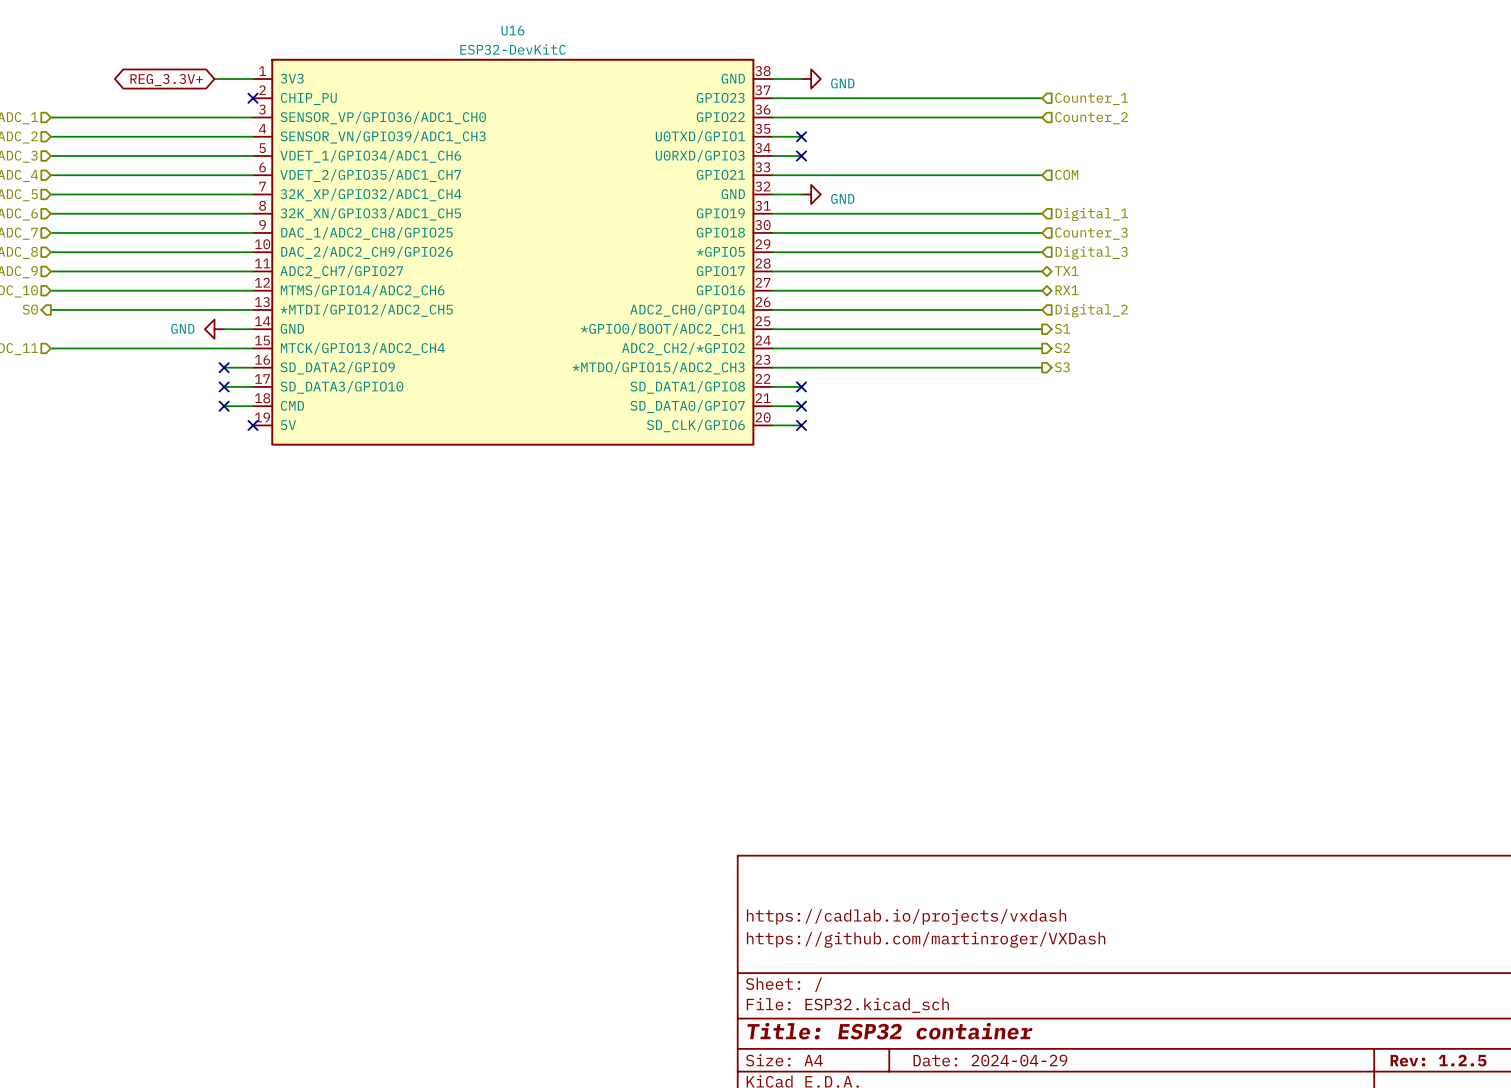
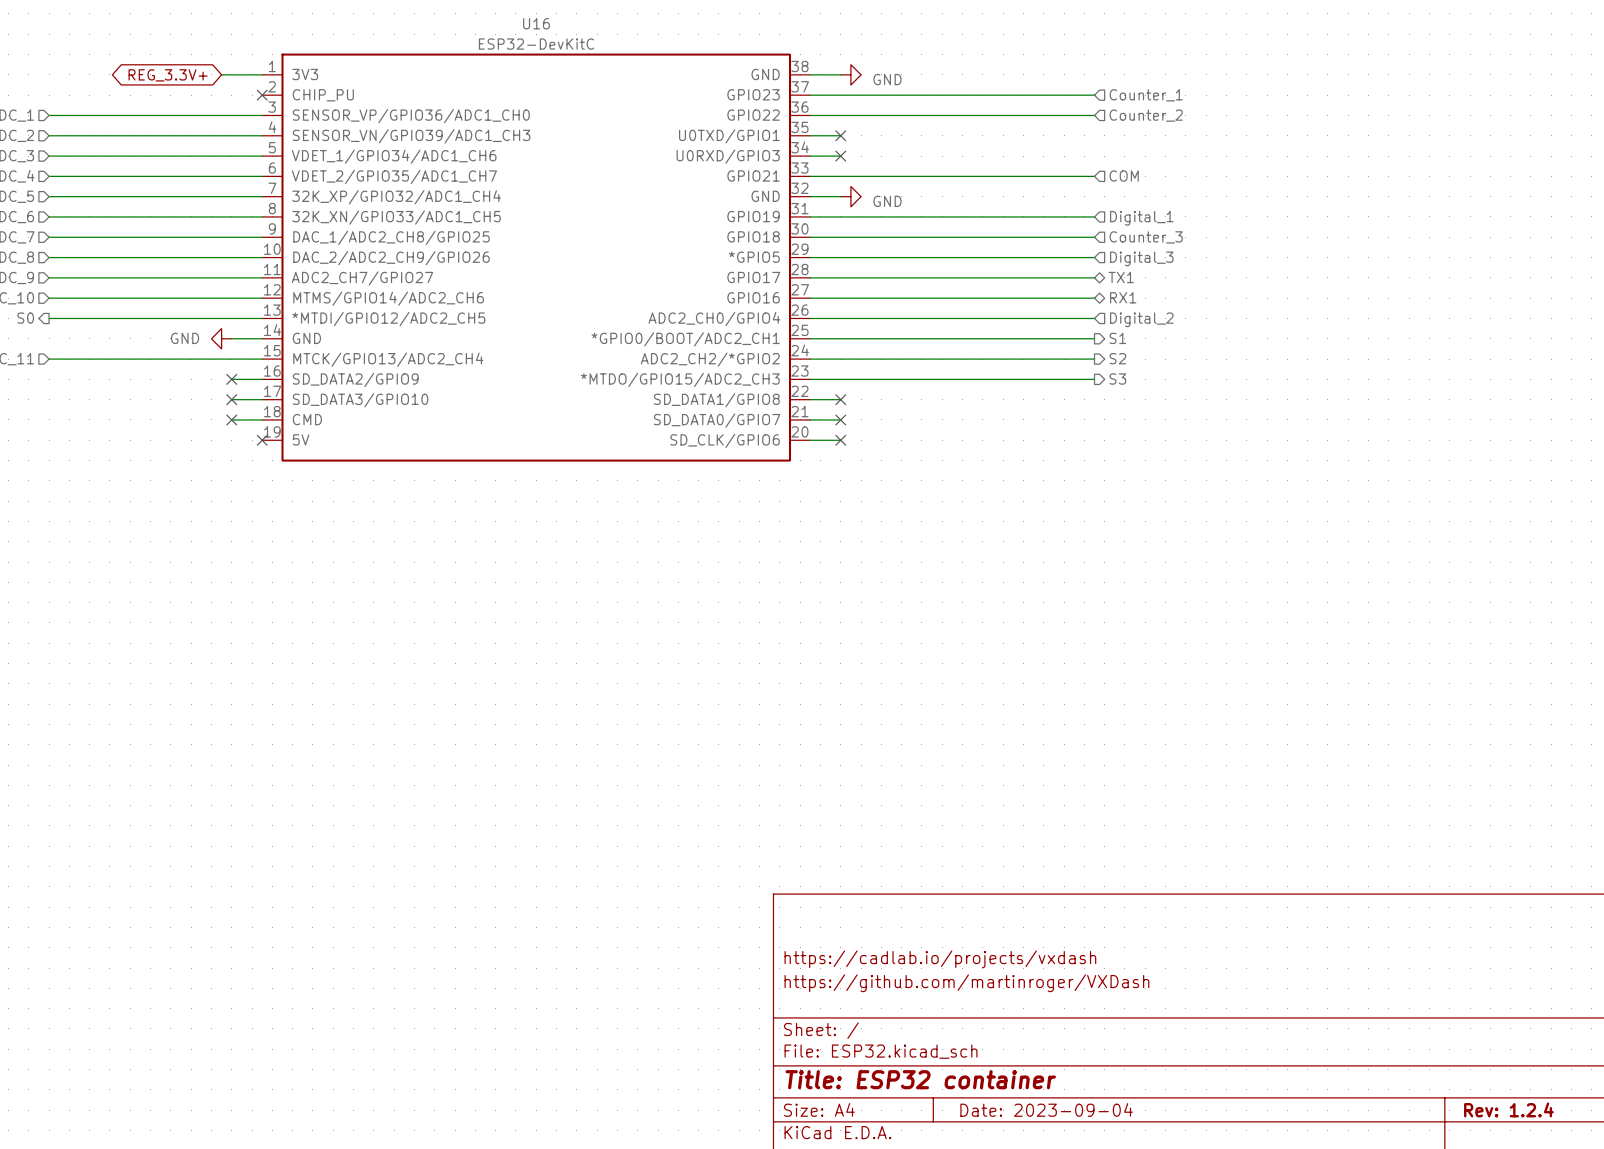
title block: Date: 2024-04-29 (990, 1060) -> Date: 2023-09-04 (1046, 1109)
title block: Rev: 1.2.5 (1438, 1060) -> Rev: 1.2.4 (1508, 1109)

